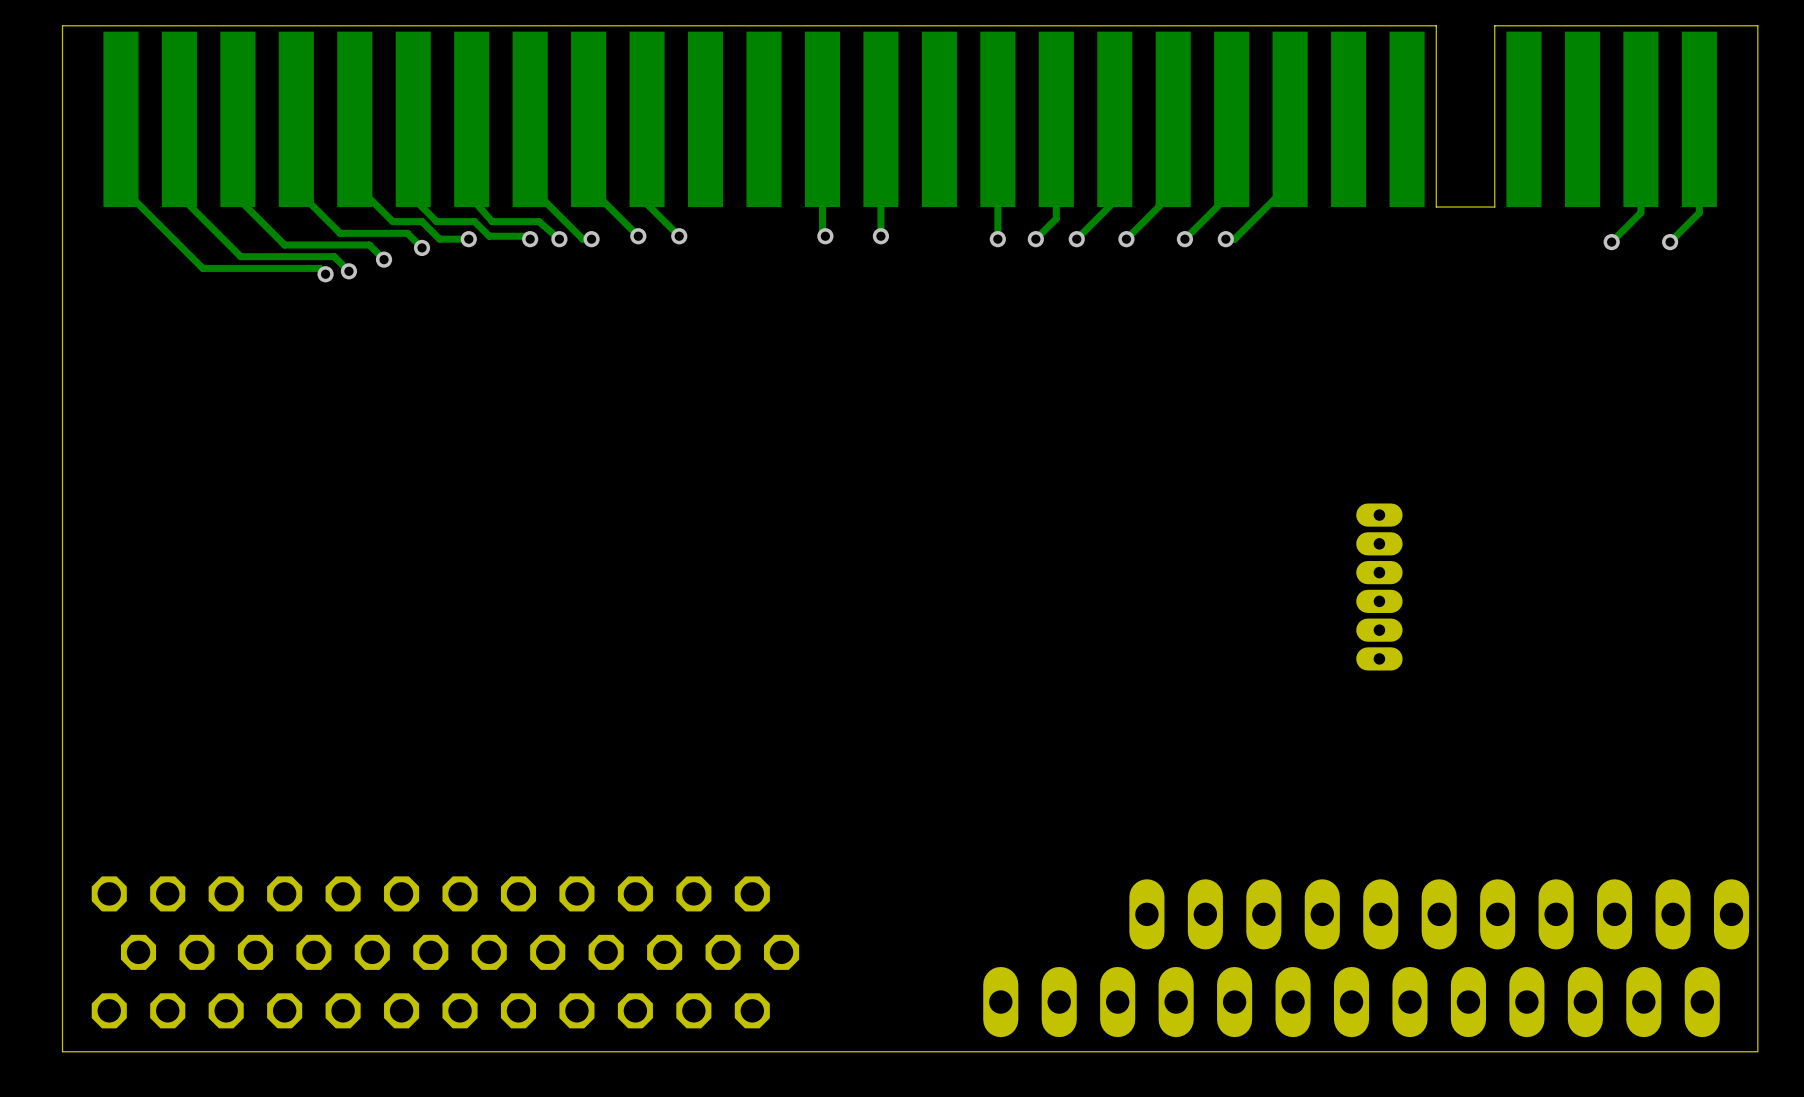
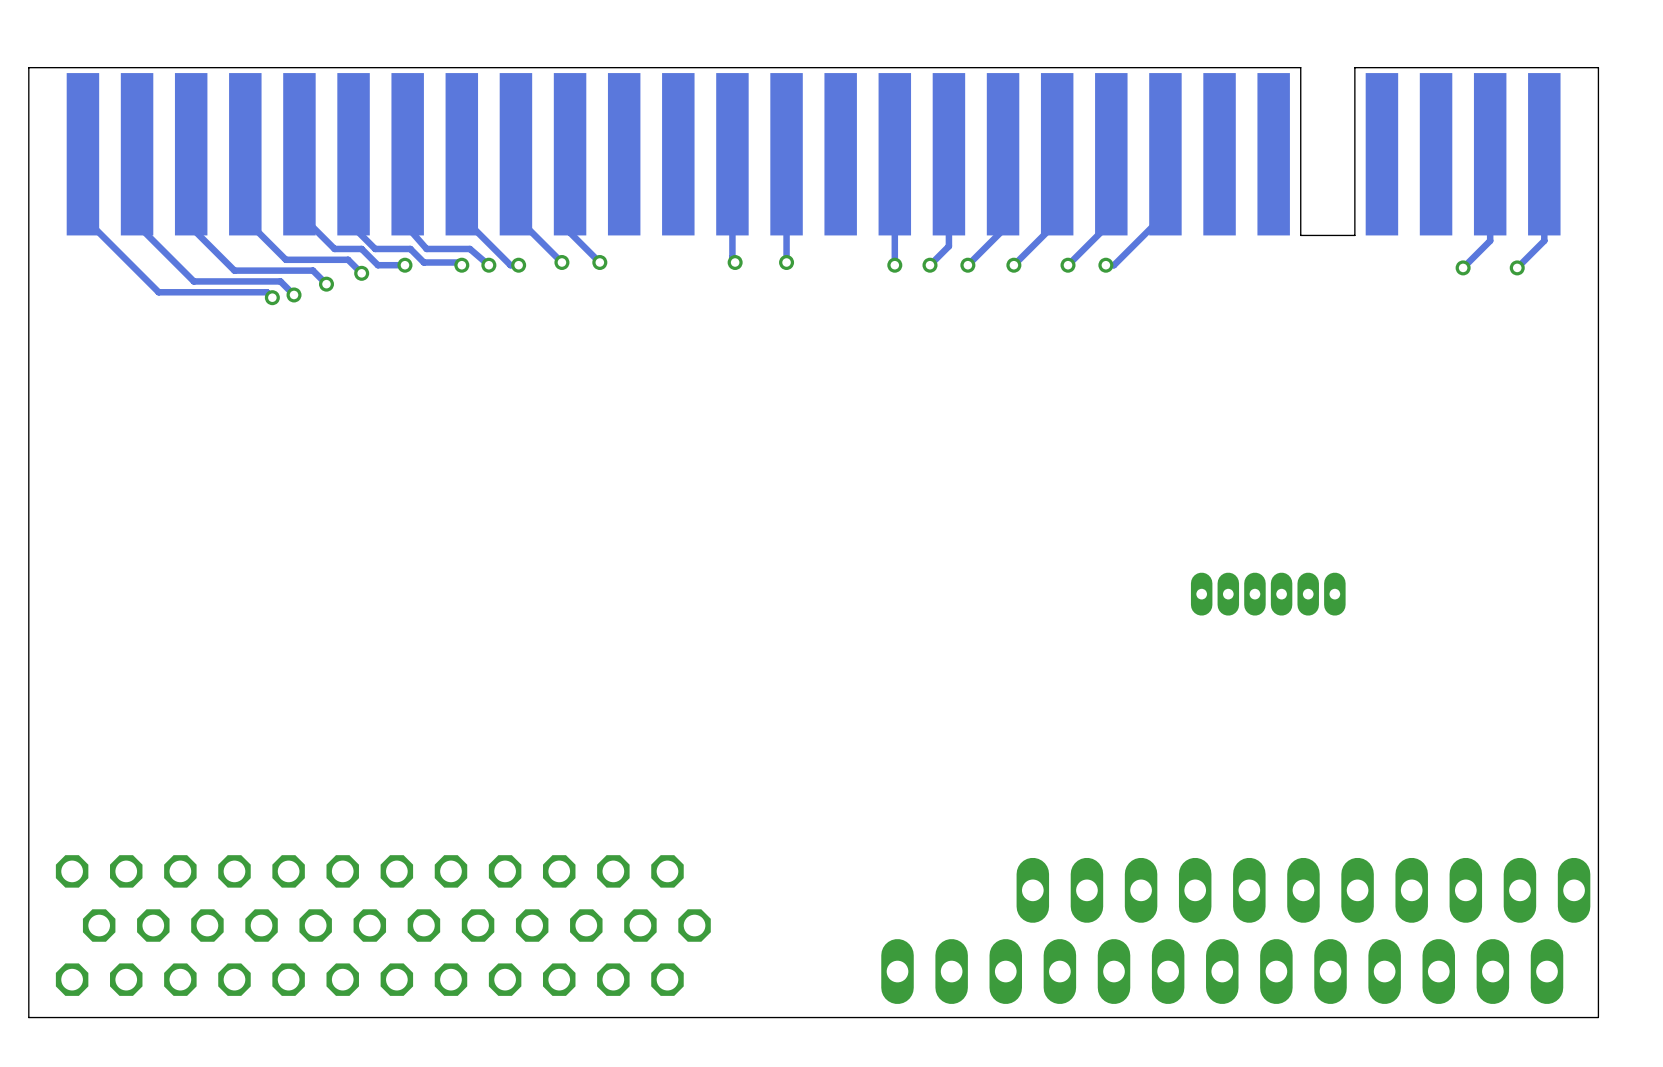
part rotation: 0° (1379, 586) -> 90° clockwise (1268, 594)

